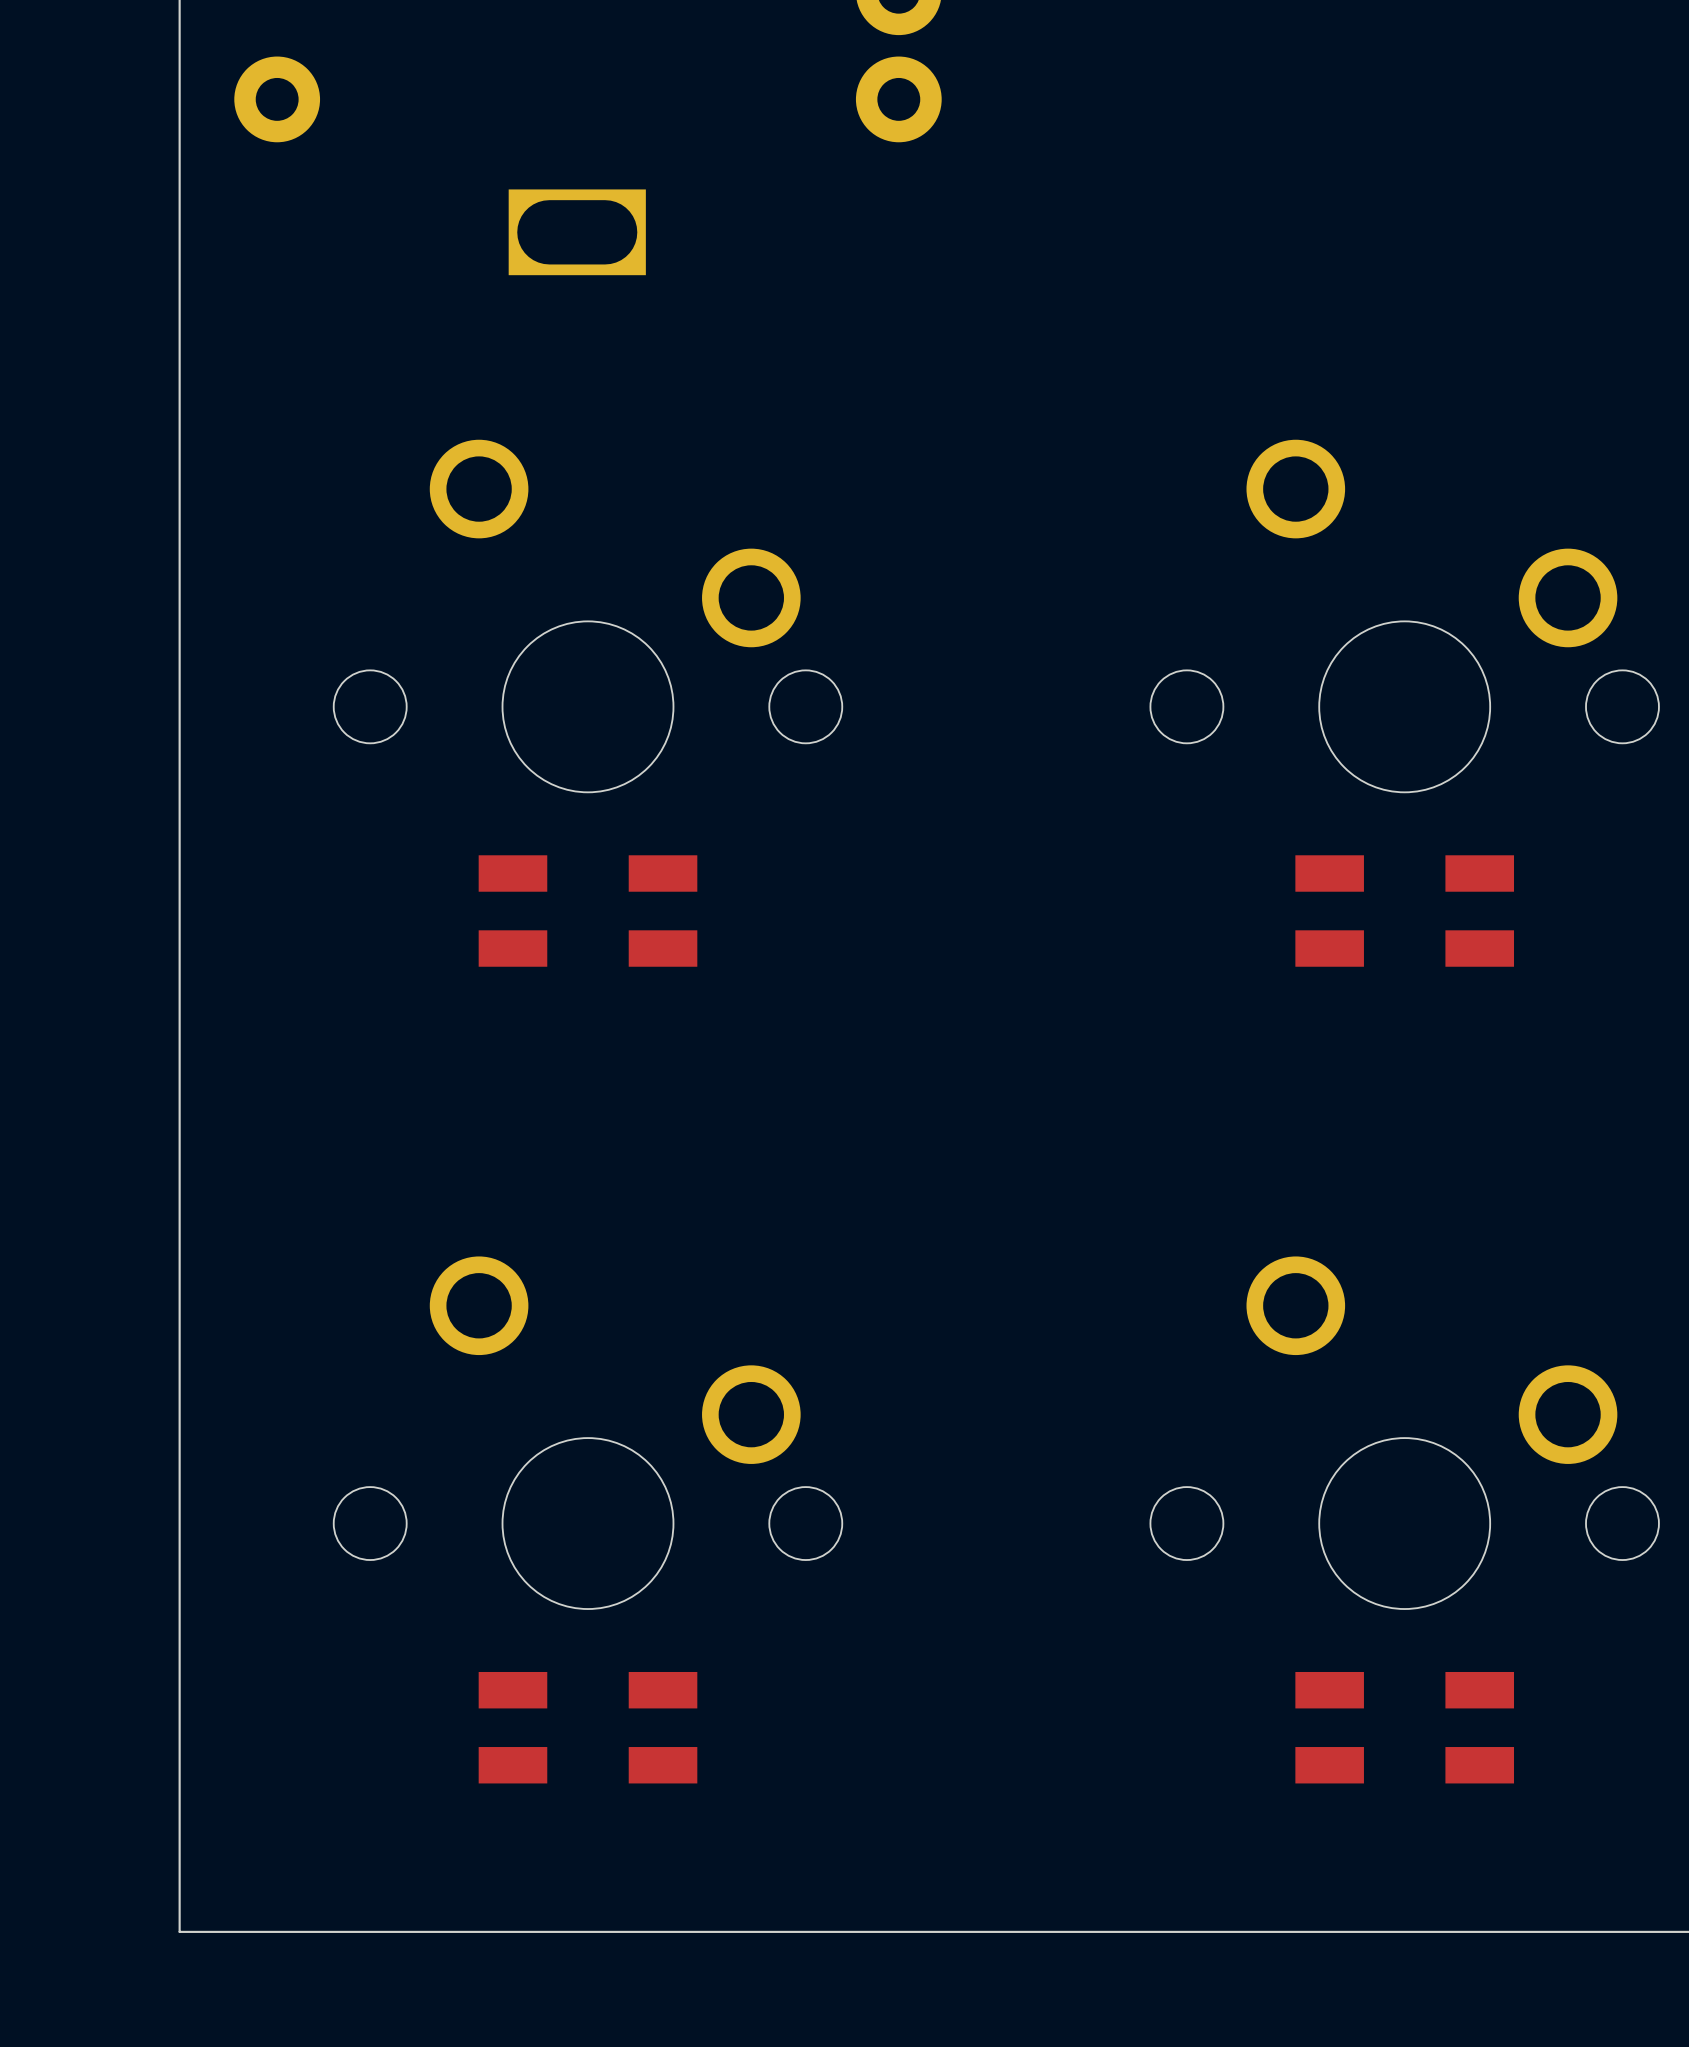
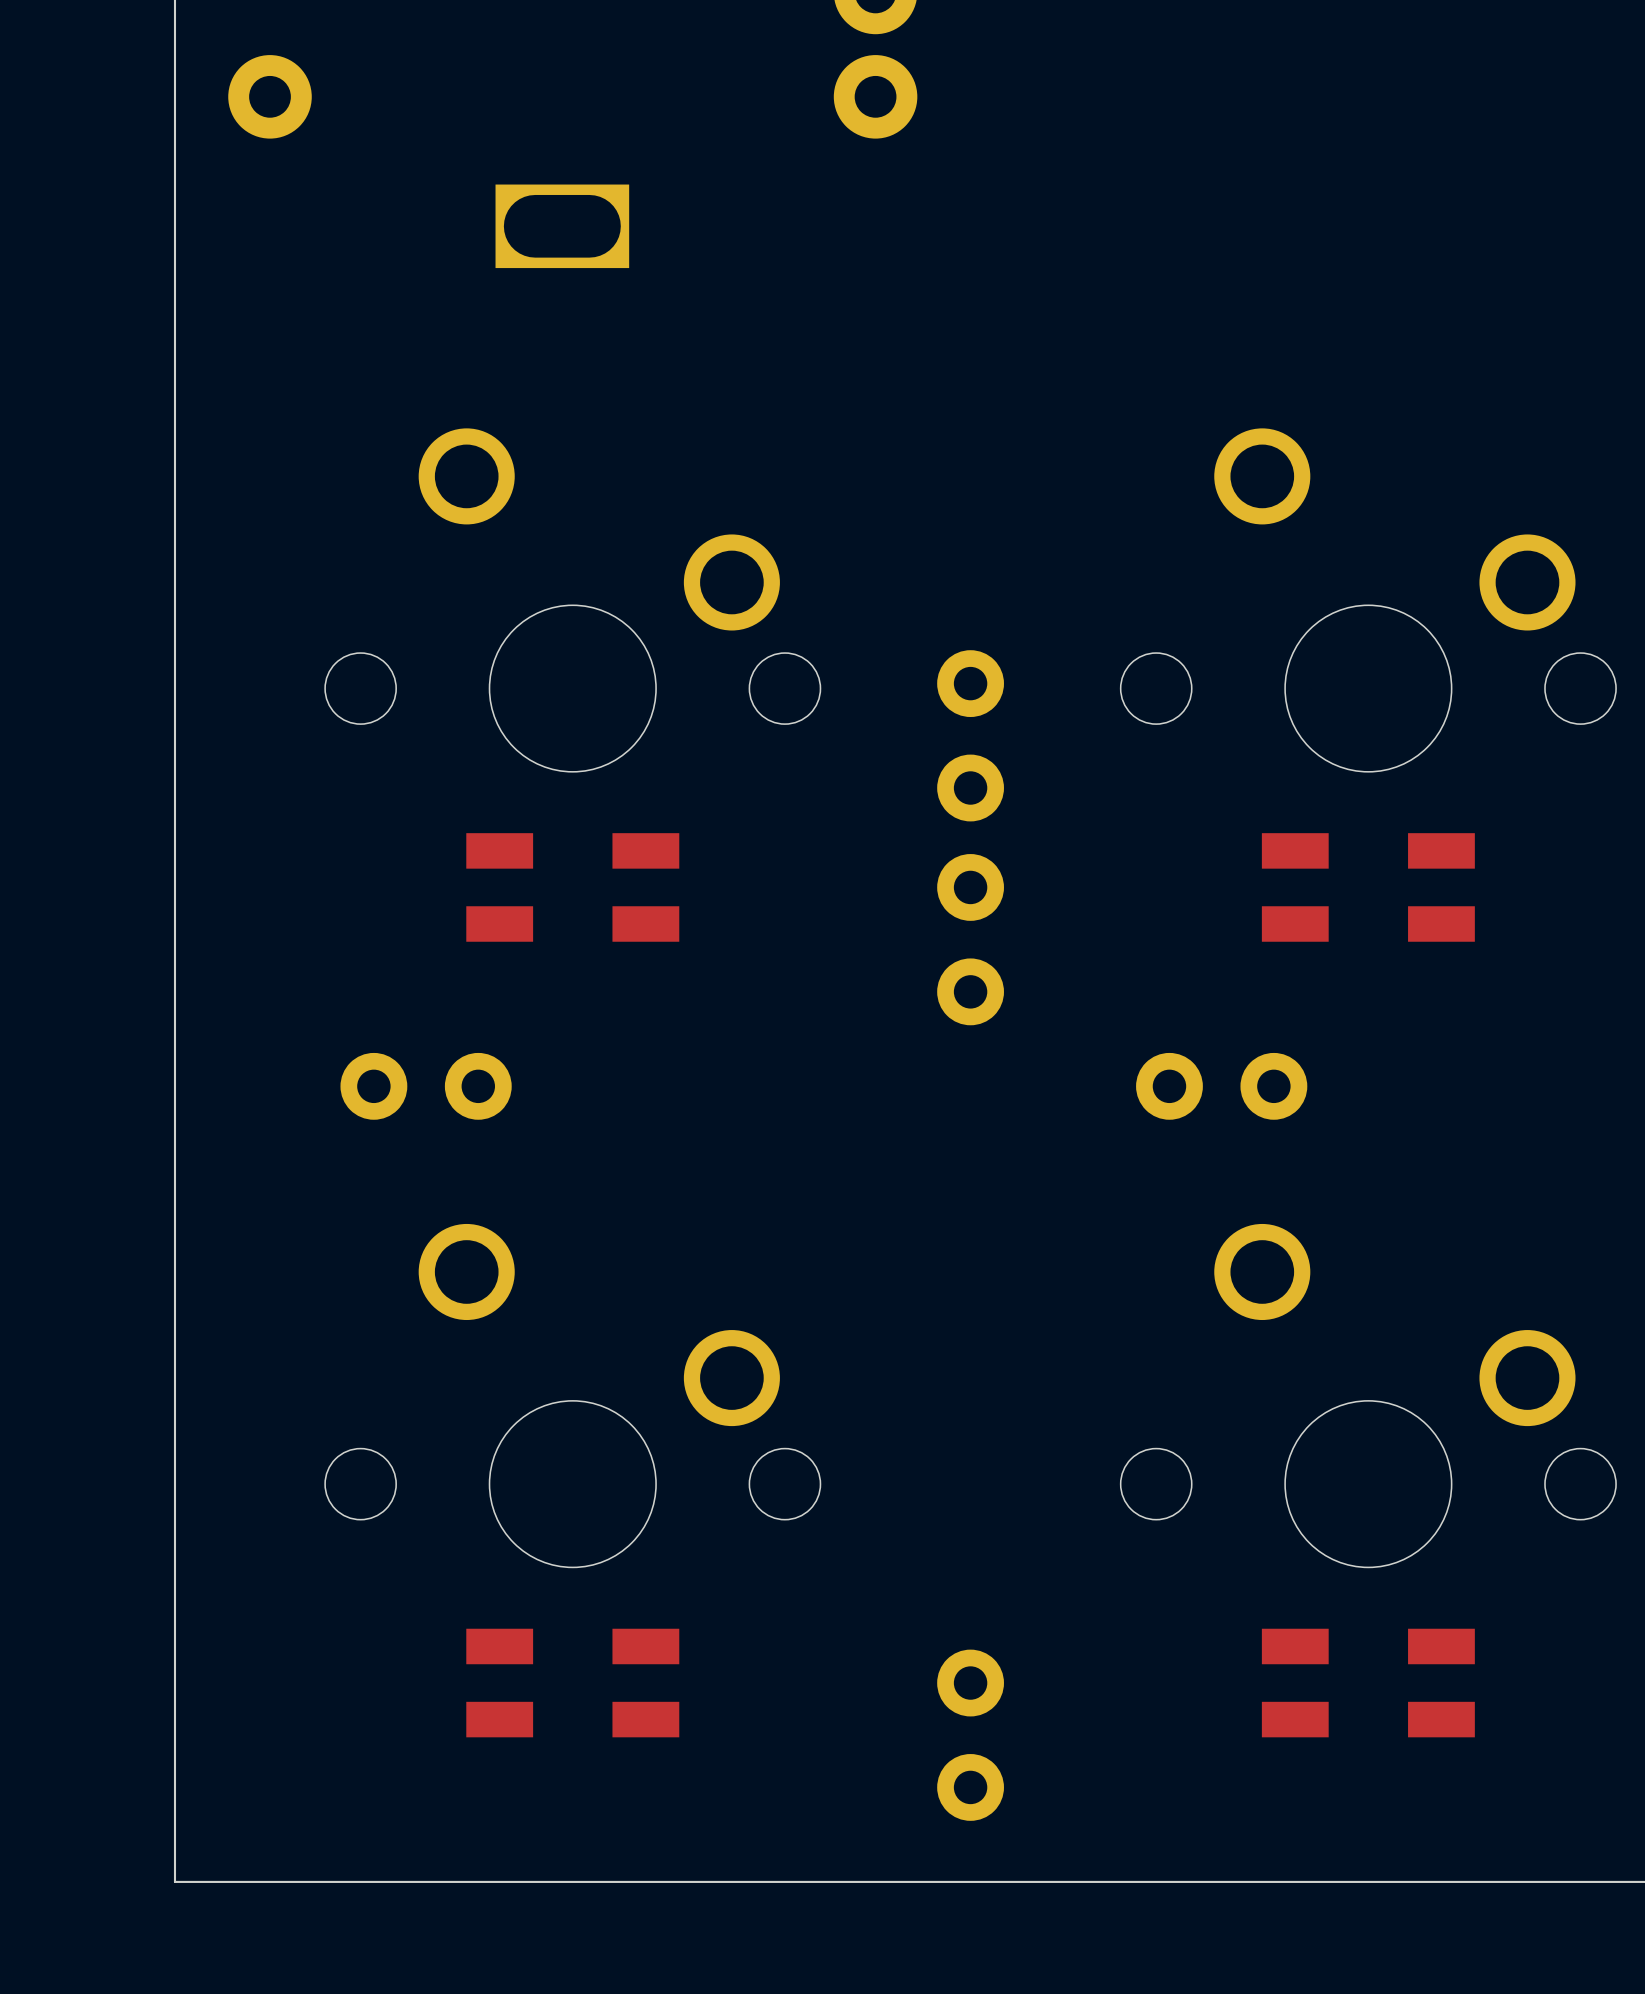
part: none -> (970, 735)
part: none -> (970, 939)
part: none -> (426, 1086)
part: none -> (1221, 1086)
part: none -> (970, 1735)

